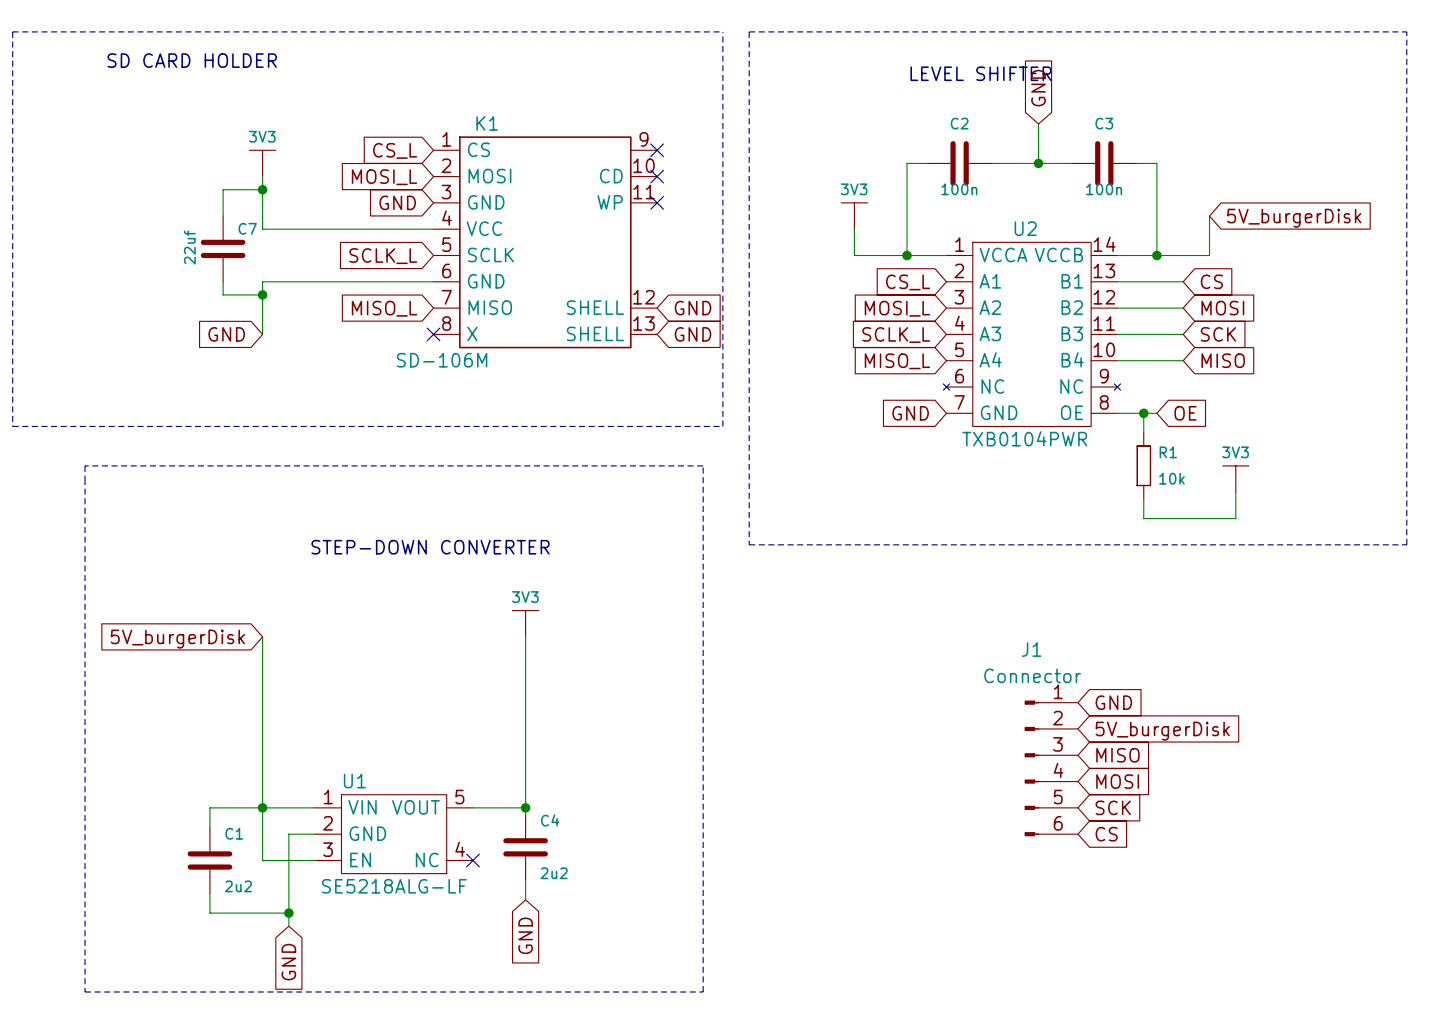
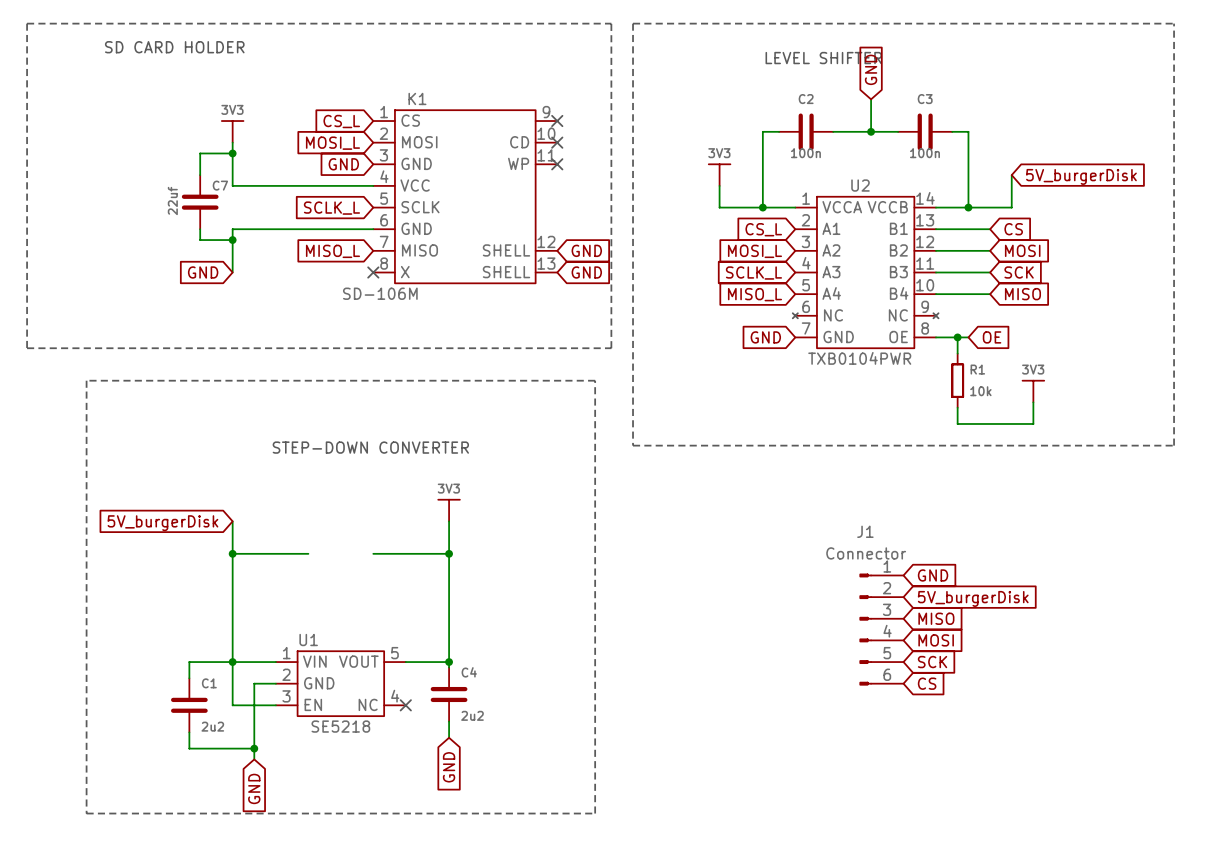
wire: none -> (232, 553) (308, 553)
junction: none -> (232, 553)
wire: none -> (373, 553) (449, 553)
junction: none -> (449, 553)
U1 value: SE5218ALG-LF (394, 886) -> SE5218 (340, 726)

